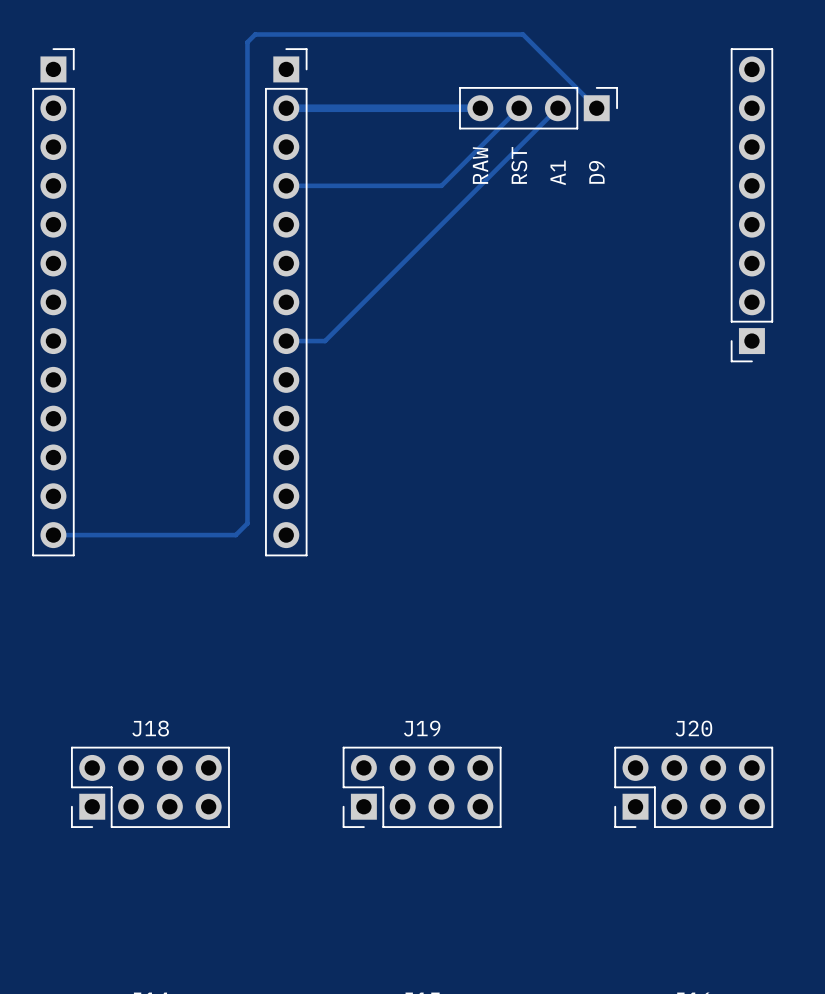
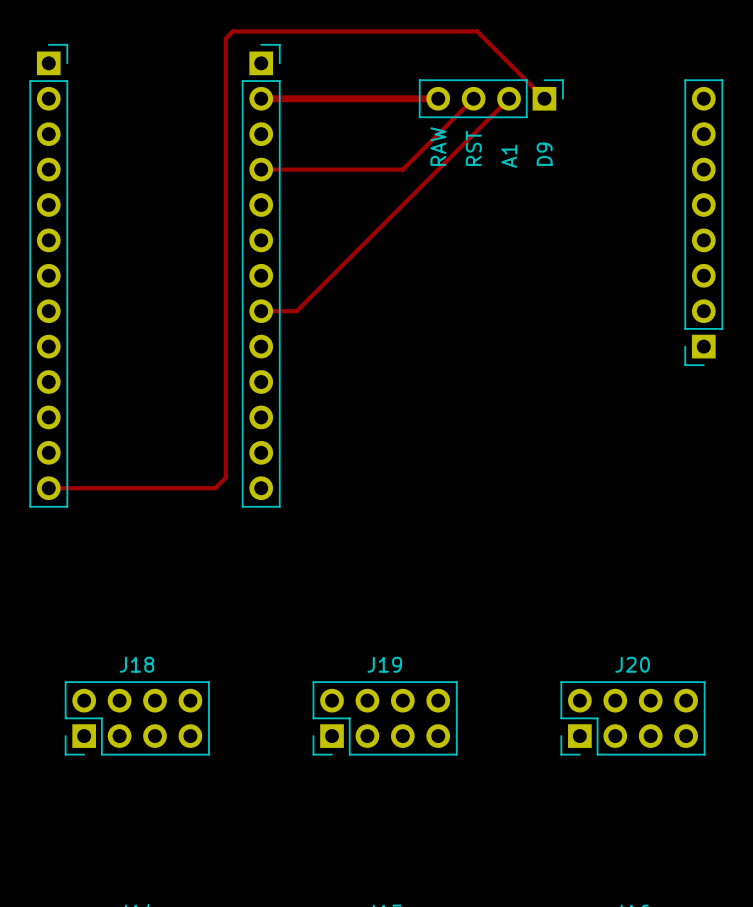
part position: (751, 205) -> (703, 222)

